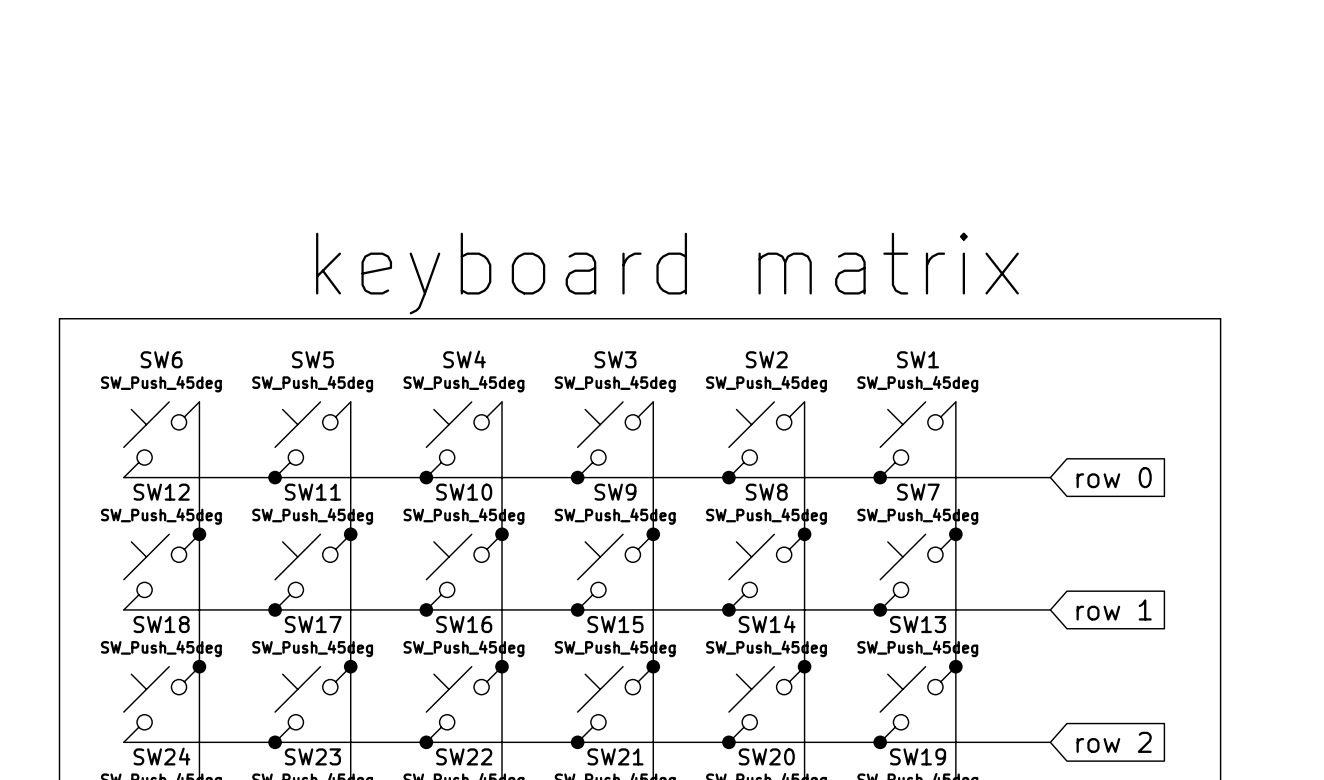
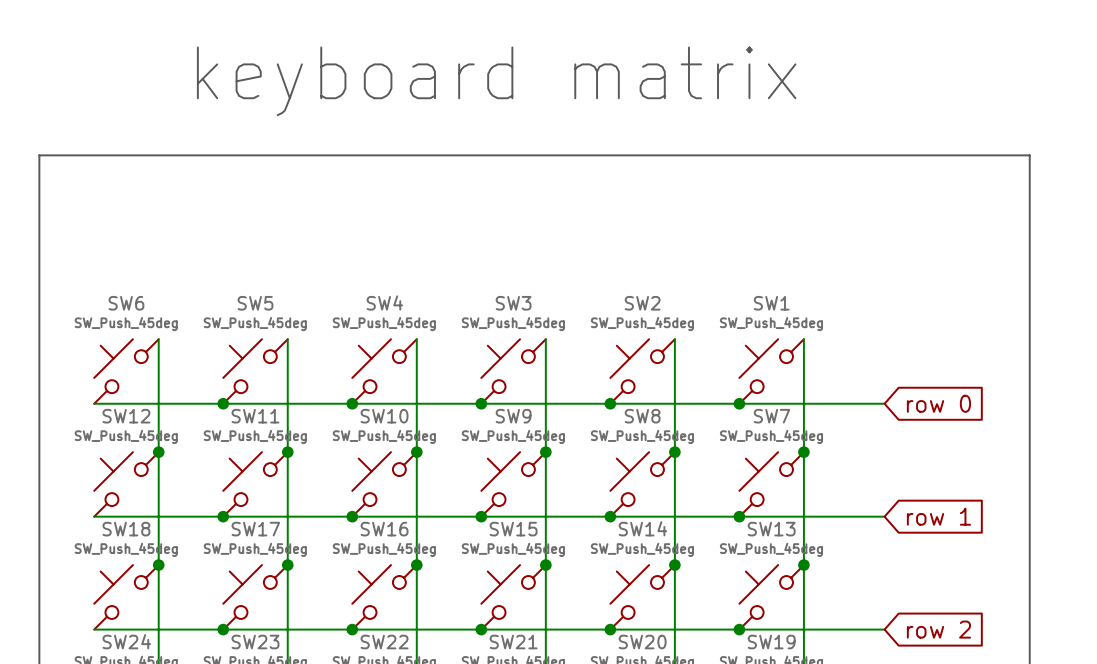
text position: keyboard matrix (667, 273) -> keyboard matrix (496, 81)
line: (59, 318) (1220, 318) -> (39, 268) (39, 155) (1029, 155) (1029, 268)

